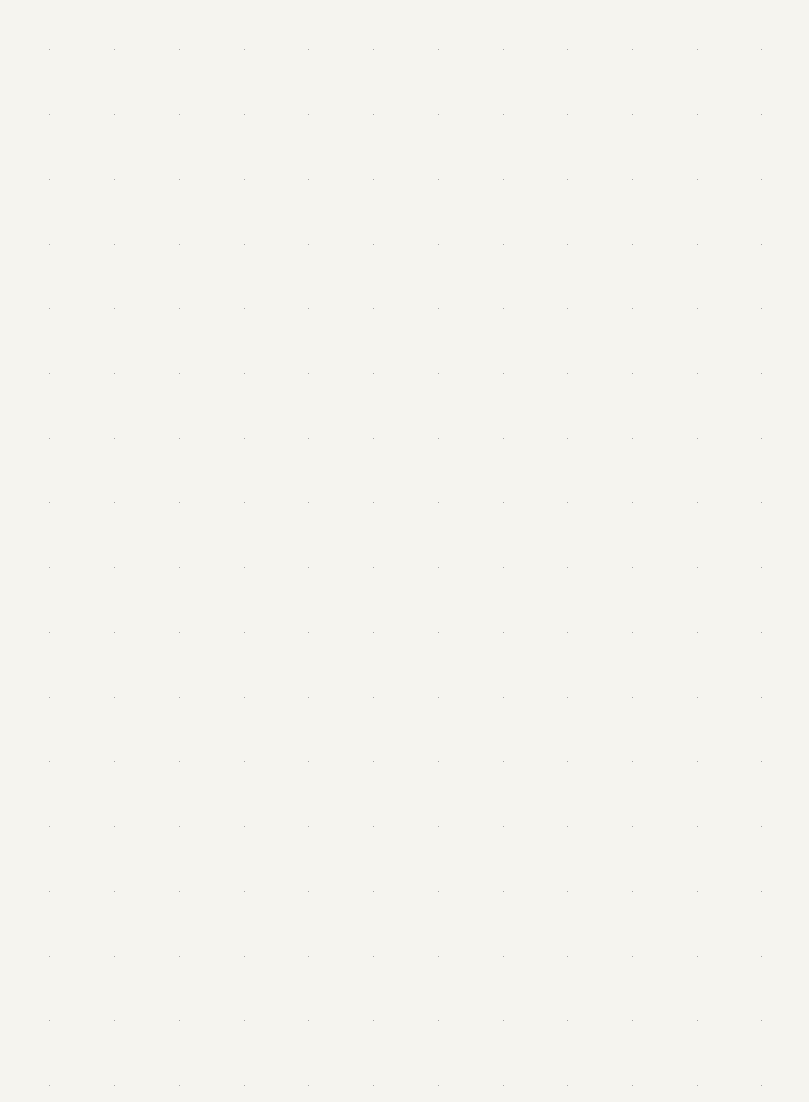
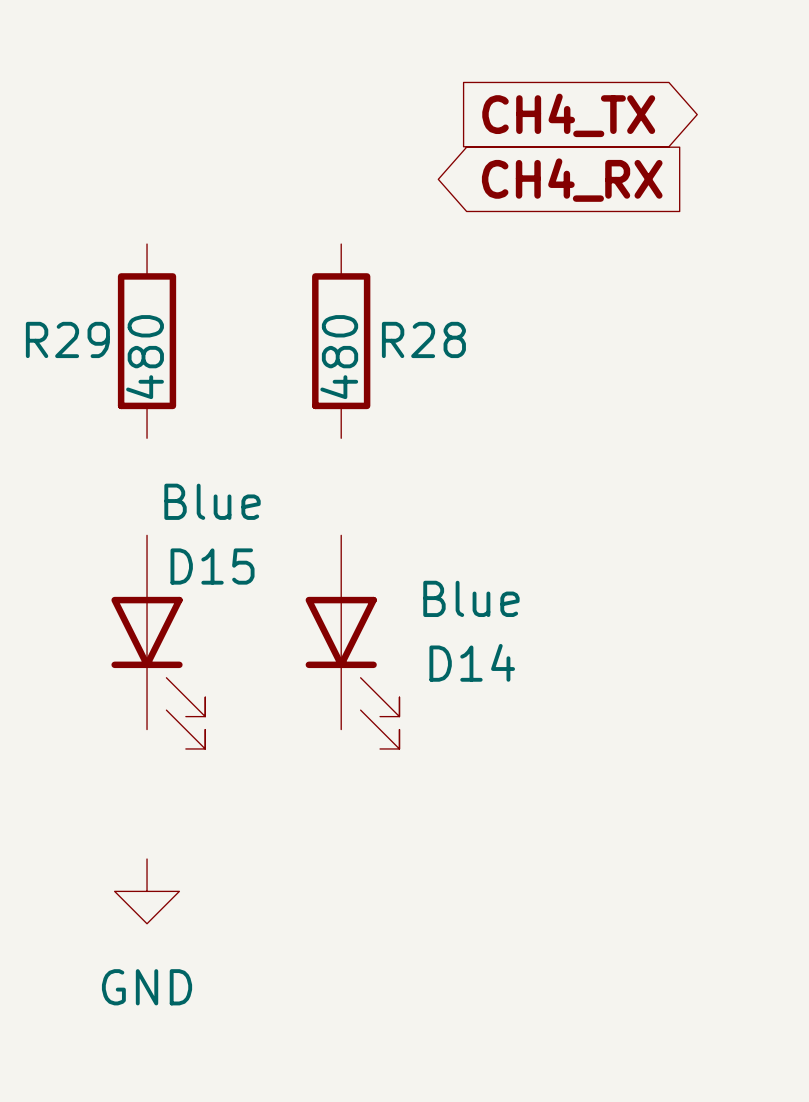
global label: none -> CH4_TX (568, 115)
global label: none -> CH4_RX (572, 180)
R29: none -> 480 (147, 341)
R28: none -> 480 (341, 341)
Blue: none -> D15 (158, 642)
Blue: none -> D14 (352, 642)
power symbol: none -> GND (147, 891)

